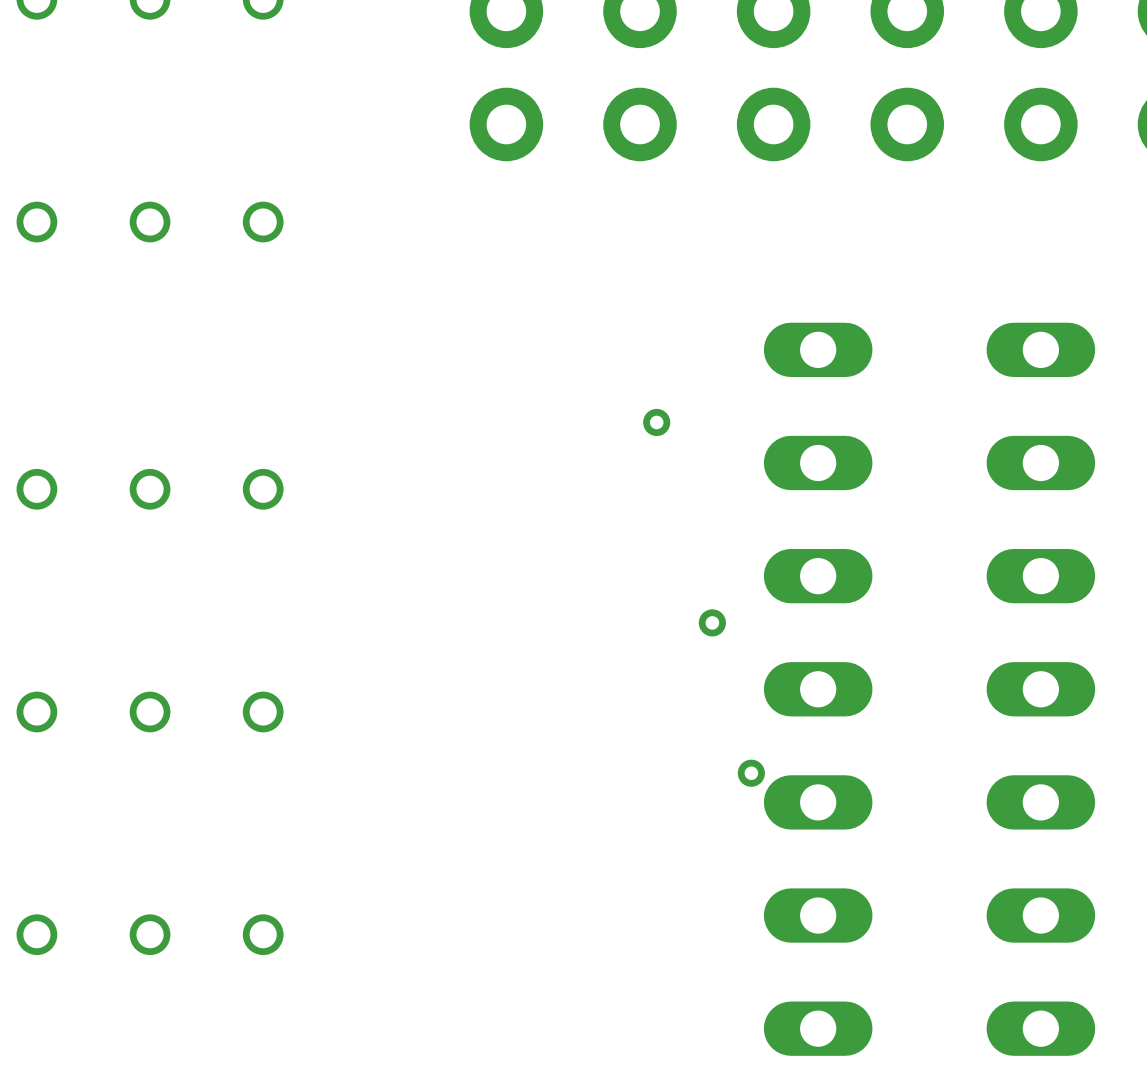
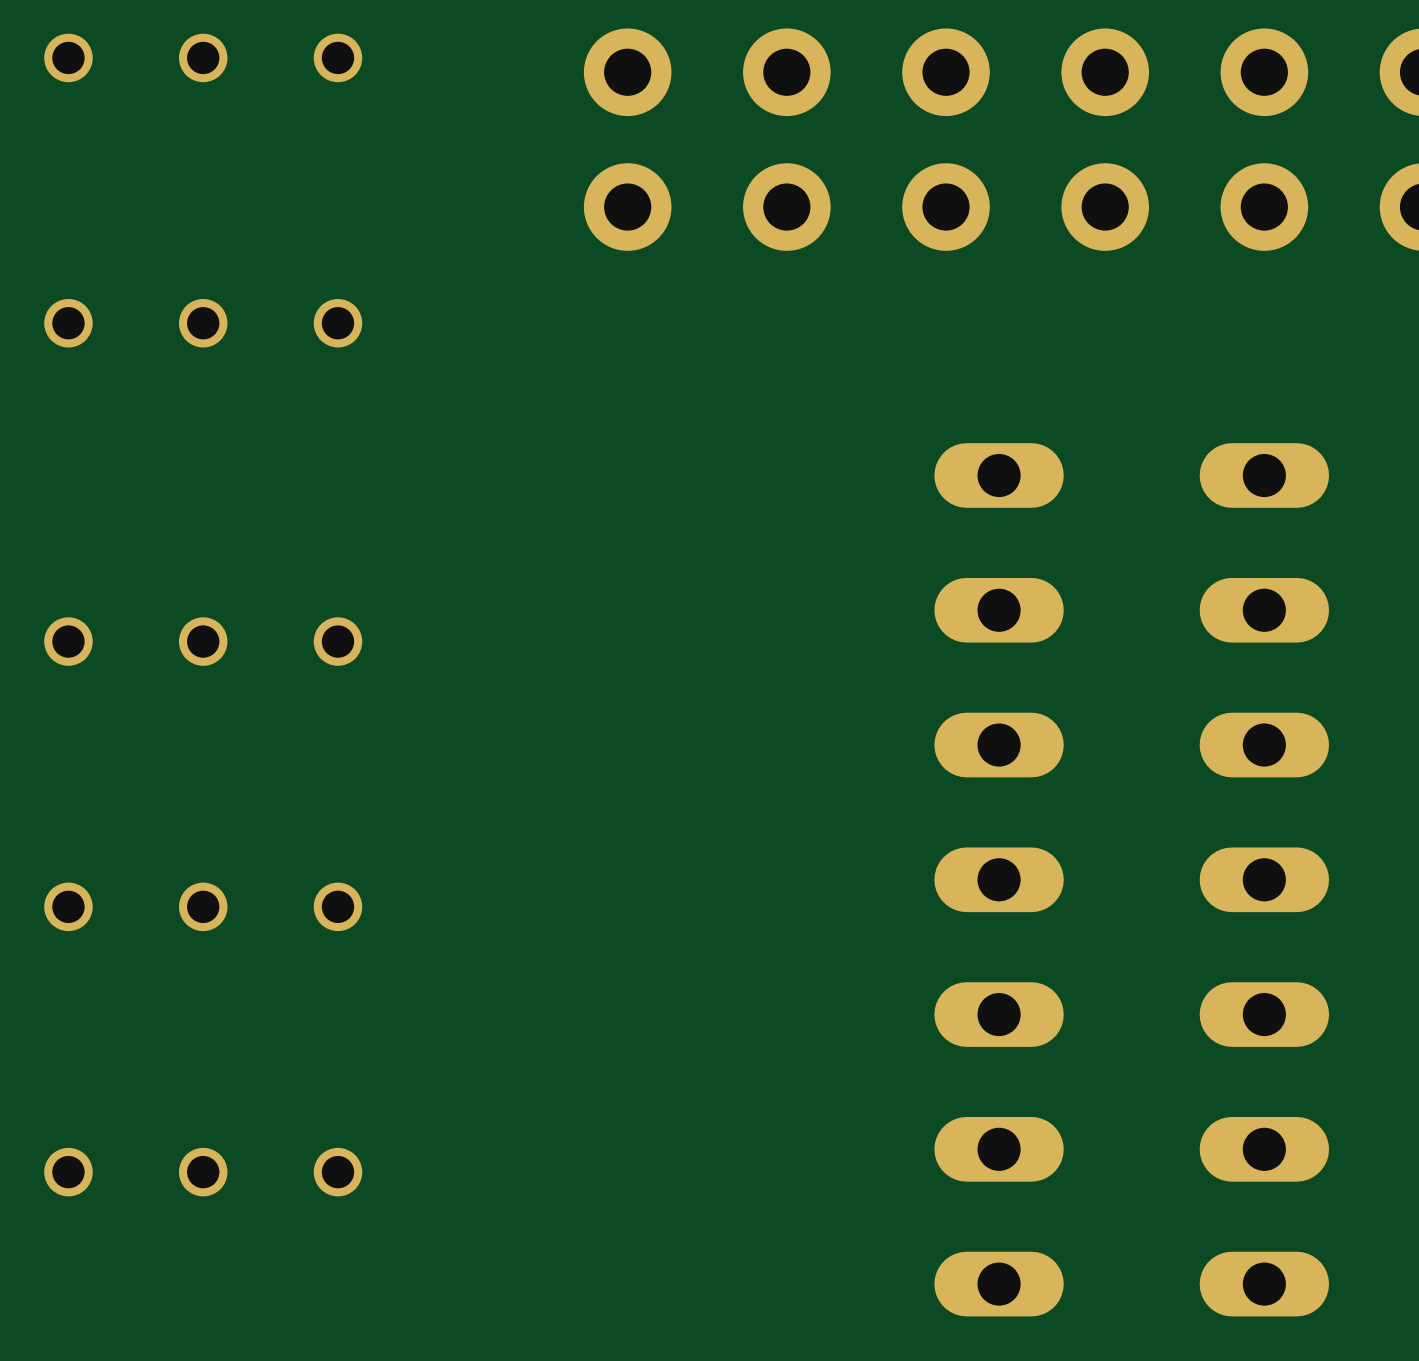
via: (656, 422) -> none
via: (712, 622) -> none
via: (751, 773) -> none

